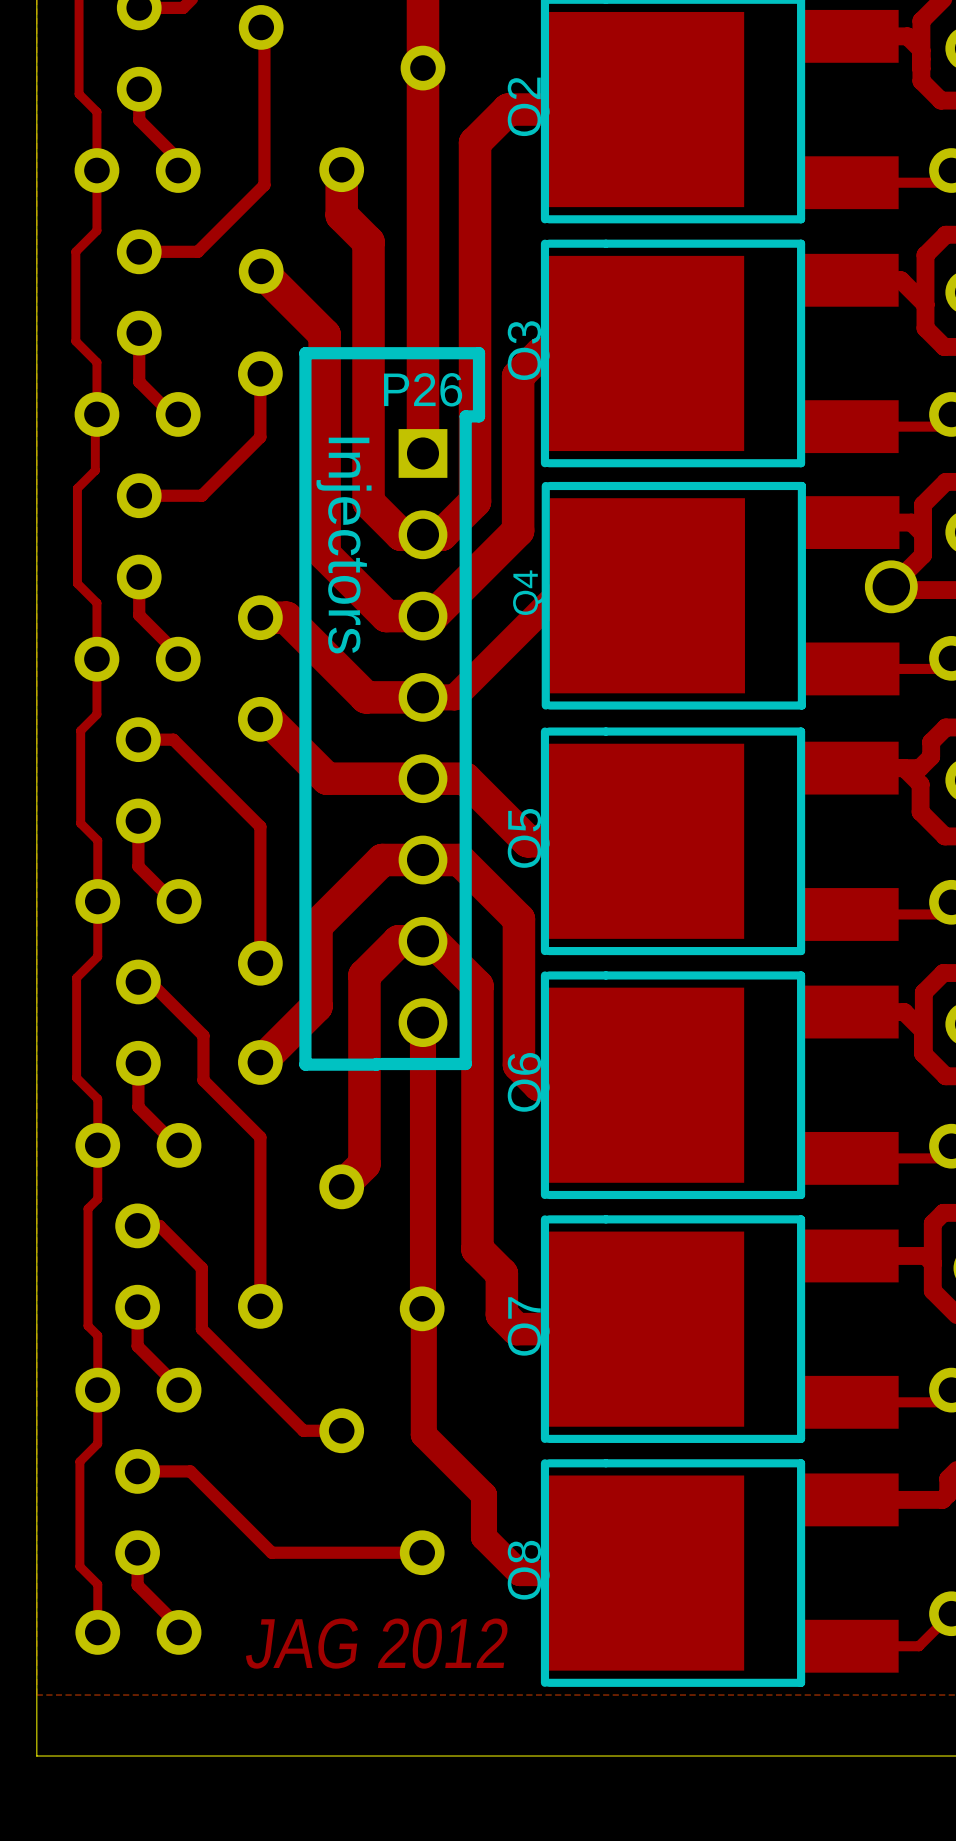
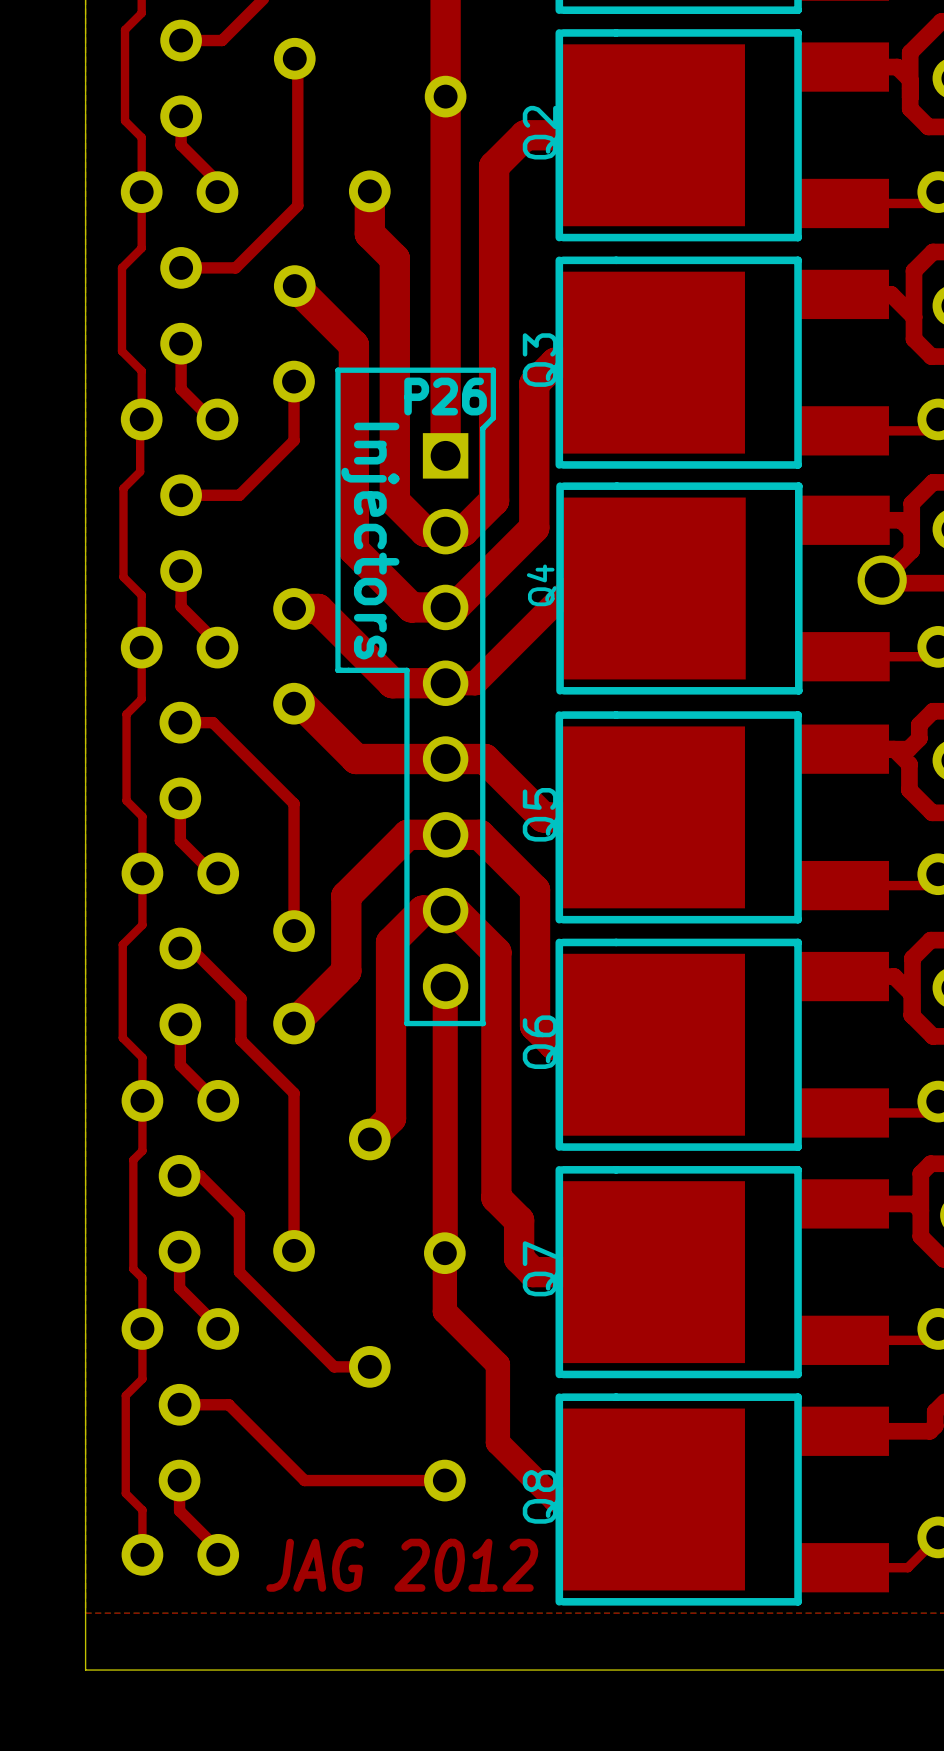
line: none -> (482, 1023) (482, 428) (493, 417) (493, 370) (337, 370) (337, 670) (406, 670) (406, 1023) (483, 1023)
line: (376, 1063) (305, 1064) (305, 353) (479, 353) (479, 416) (465, 416) (465, 1064) (381, 1064) -> none
top track: (423, 1308) (423, 1434) (483, 1495) (483, 1537) (519, 1573) (540, 1573) -> (445, 986) (444, 1311) (497, 1364) (497, 1442) (554, 1499)

